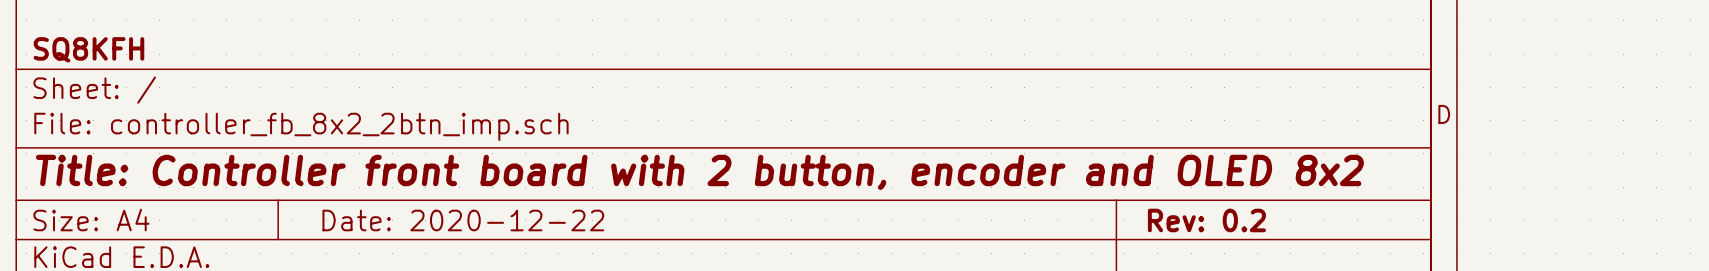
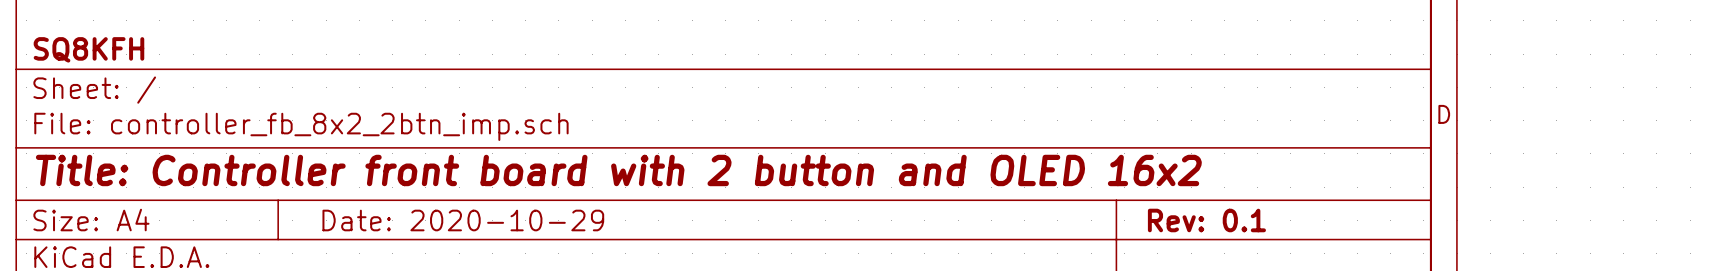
title block: Title: Controller front board with 2 button, encoder and OLED 8x2 (699, 172) -> Title: Controller front board with 2 button and OLED 16x2 (618, 170)
title block: Date: 2020-12-22 (463, 220) -> Date: 2020-10-29 (463, 220)
title block: Rev: 0.2 (1206, 220) -> Rev: 0.1 (1206, 220)

